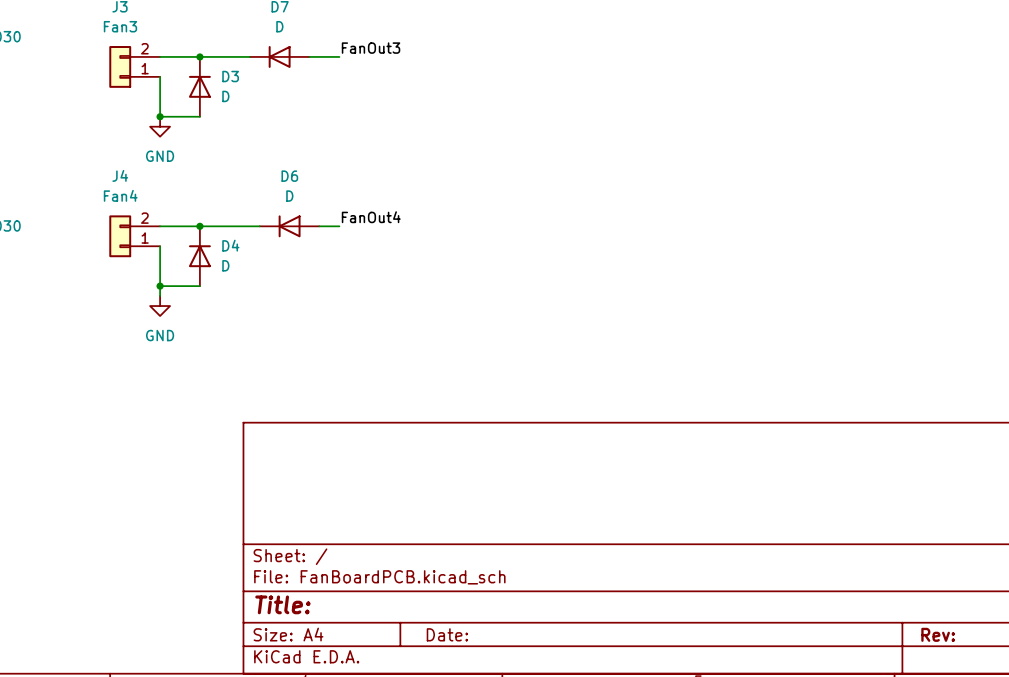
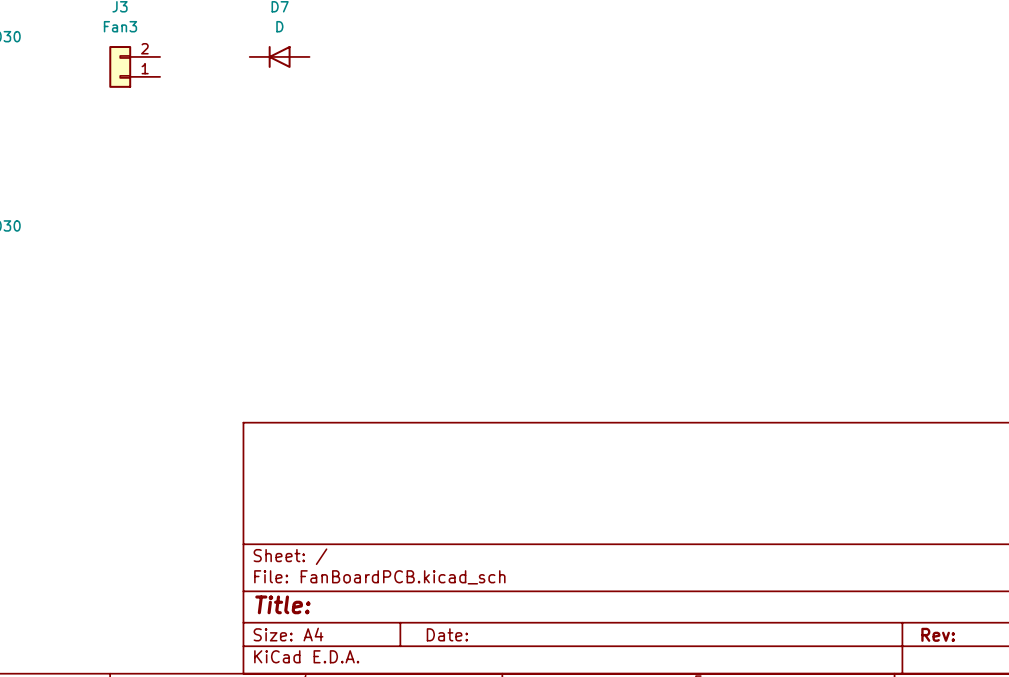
label: FanOut3 (371, 48) -> none
wire: (160, 56) (249, 56) -> none
junction: (199, 56) -> none
wire: (309, 56) (339, 56) -> none
wire: (160, 76) (160, 116) (199, 116) -> none
D3: D (199, 86) -> none
junction: (160, 116) -> none
power symbol: GND (160, 126) -> none
label: FanOut4 (371, 217) -> none
wire: (160, 226) (259, 226) -> none
junction: (199, 226) -> none
D6: D (289, 226) -> none
wire: (319, 226) (339, 226) -> none
J4: Fan4 (134, 236) -> none
wire: (160, 246) (160, 296) -> none
D4: D (199, 256) -> none
wire: (160, 286) (199, 286) -> none
junction: (160, 286) -> none
power symbol: GND (160, 306) -> none

